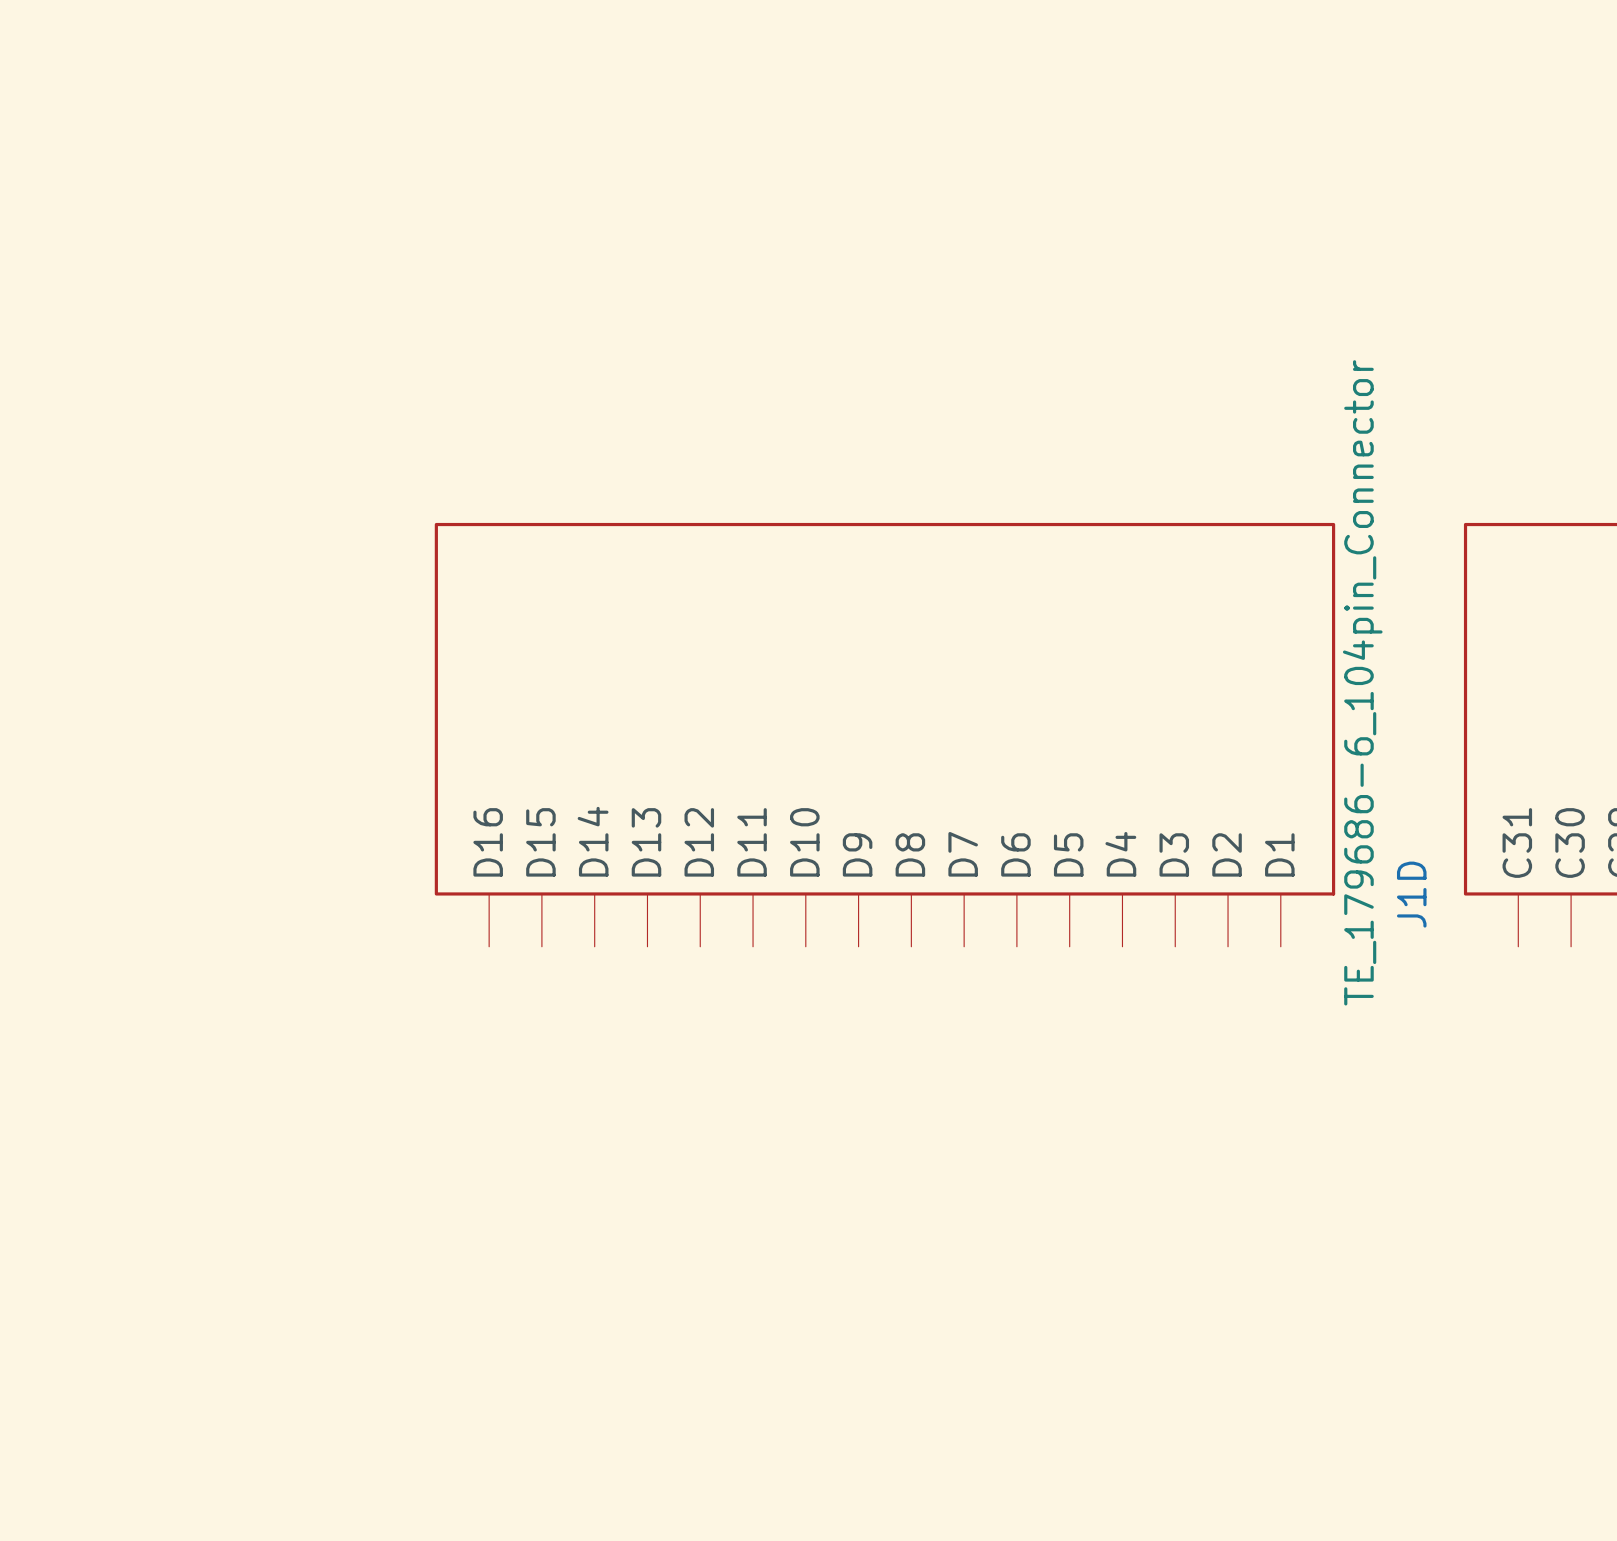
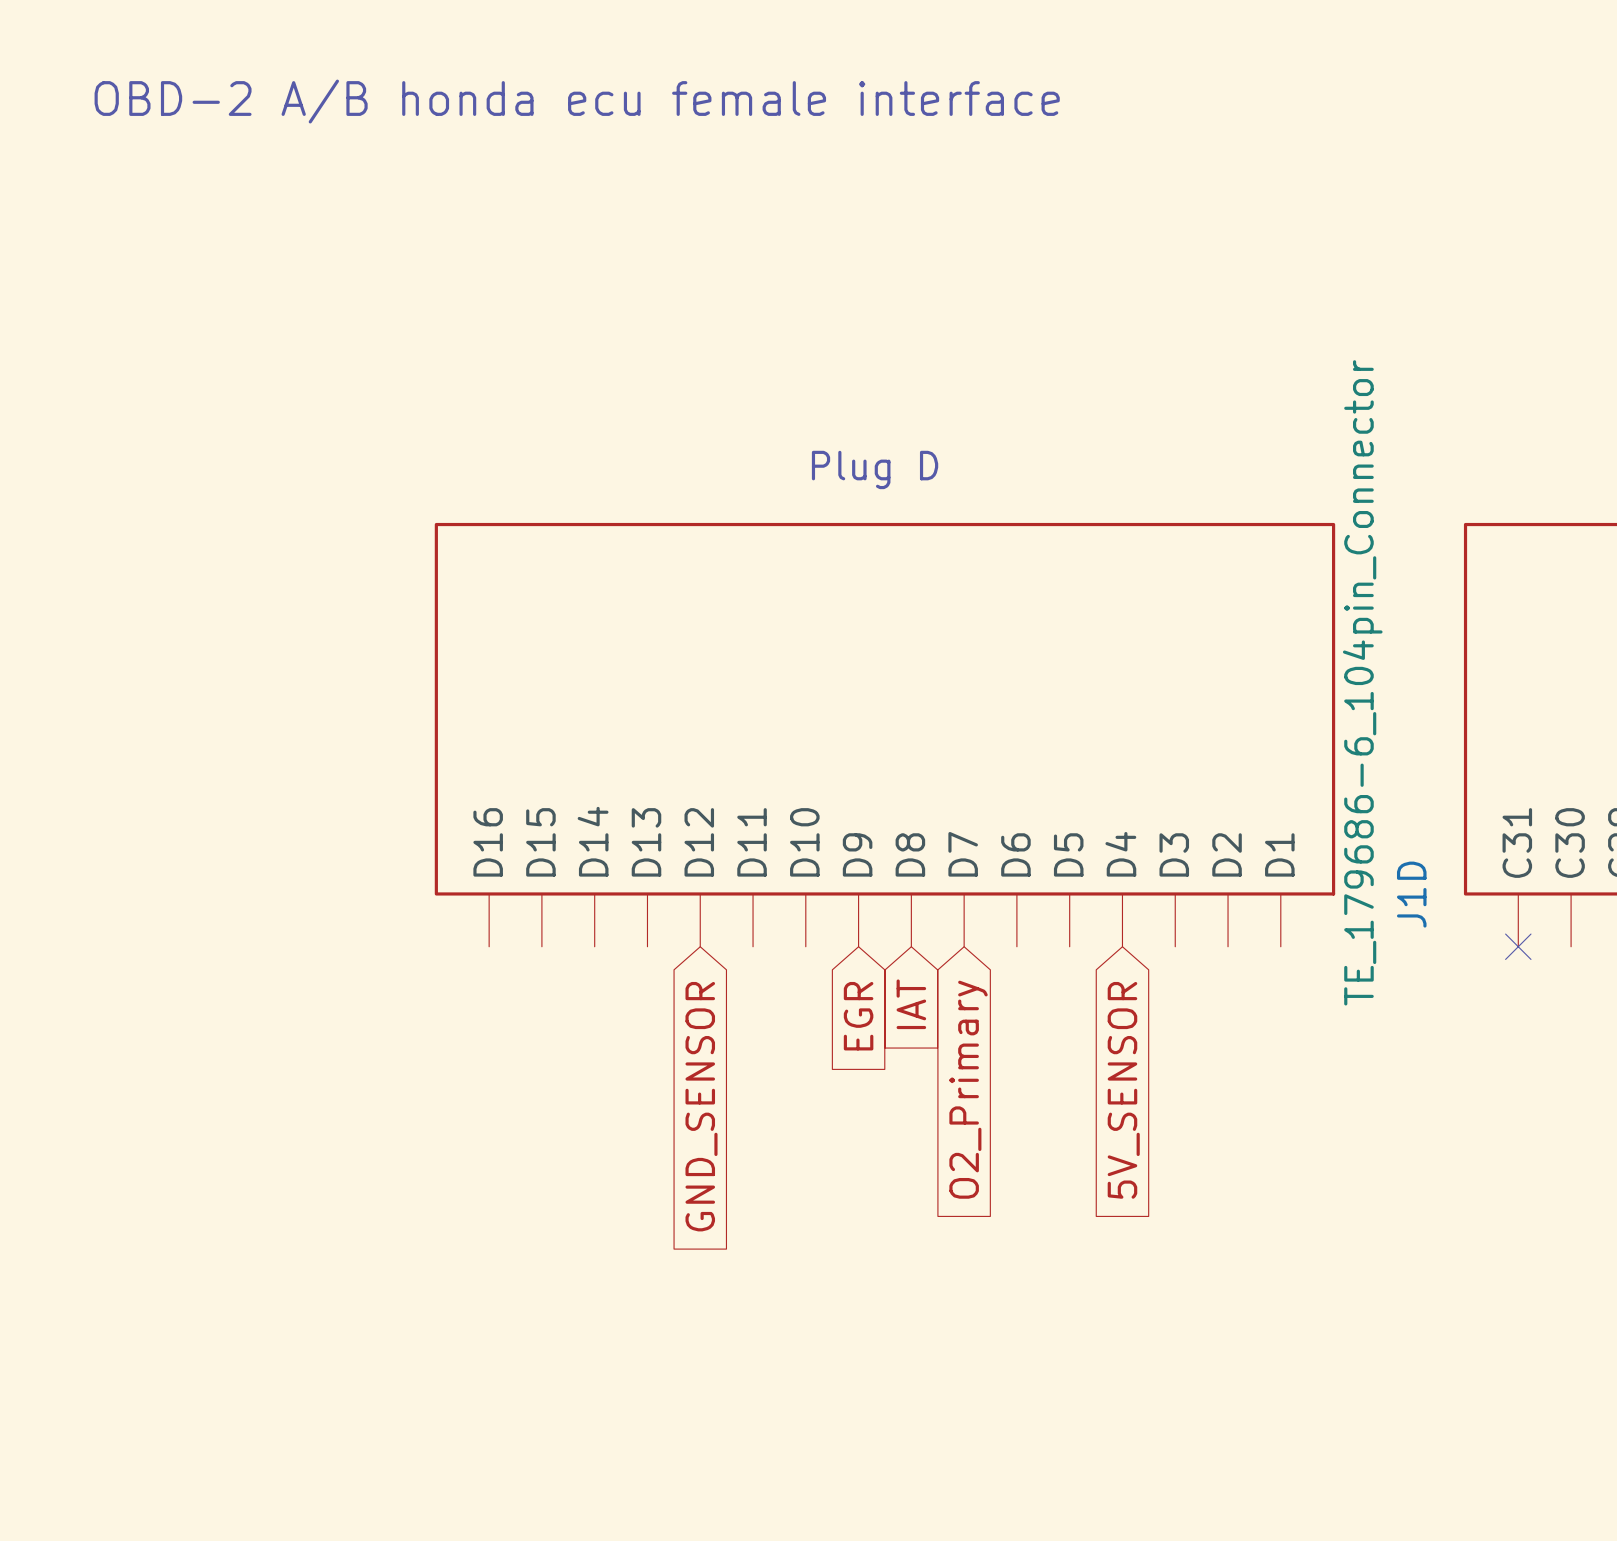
text: none -> OBD-2 A/B honda ecu female interface (577, 101)
text: none -> Plug D (875, 469)
no-connect mark: none -> (1518, 946)
global label: none -> IAT (911, 1004)
global label: none -> EGR (858, 1016)
global label: none -> O2_Primary (968, 1089)
global label: none -> 5V_SENSOR (1123, 1090)
global label: none -> GND_SENSOR (701, 1106)

